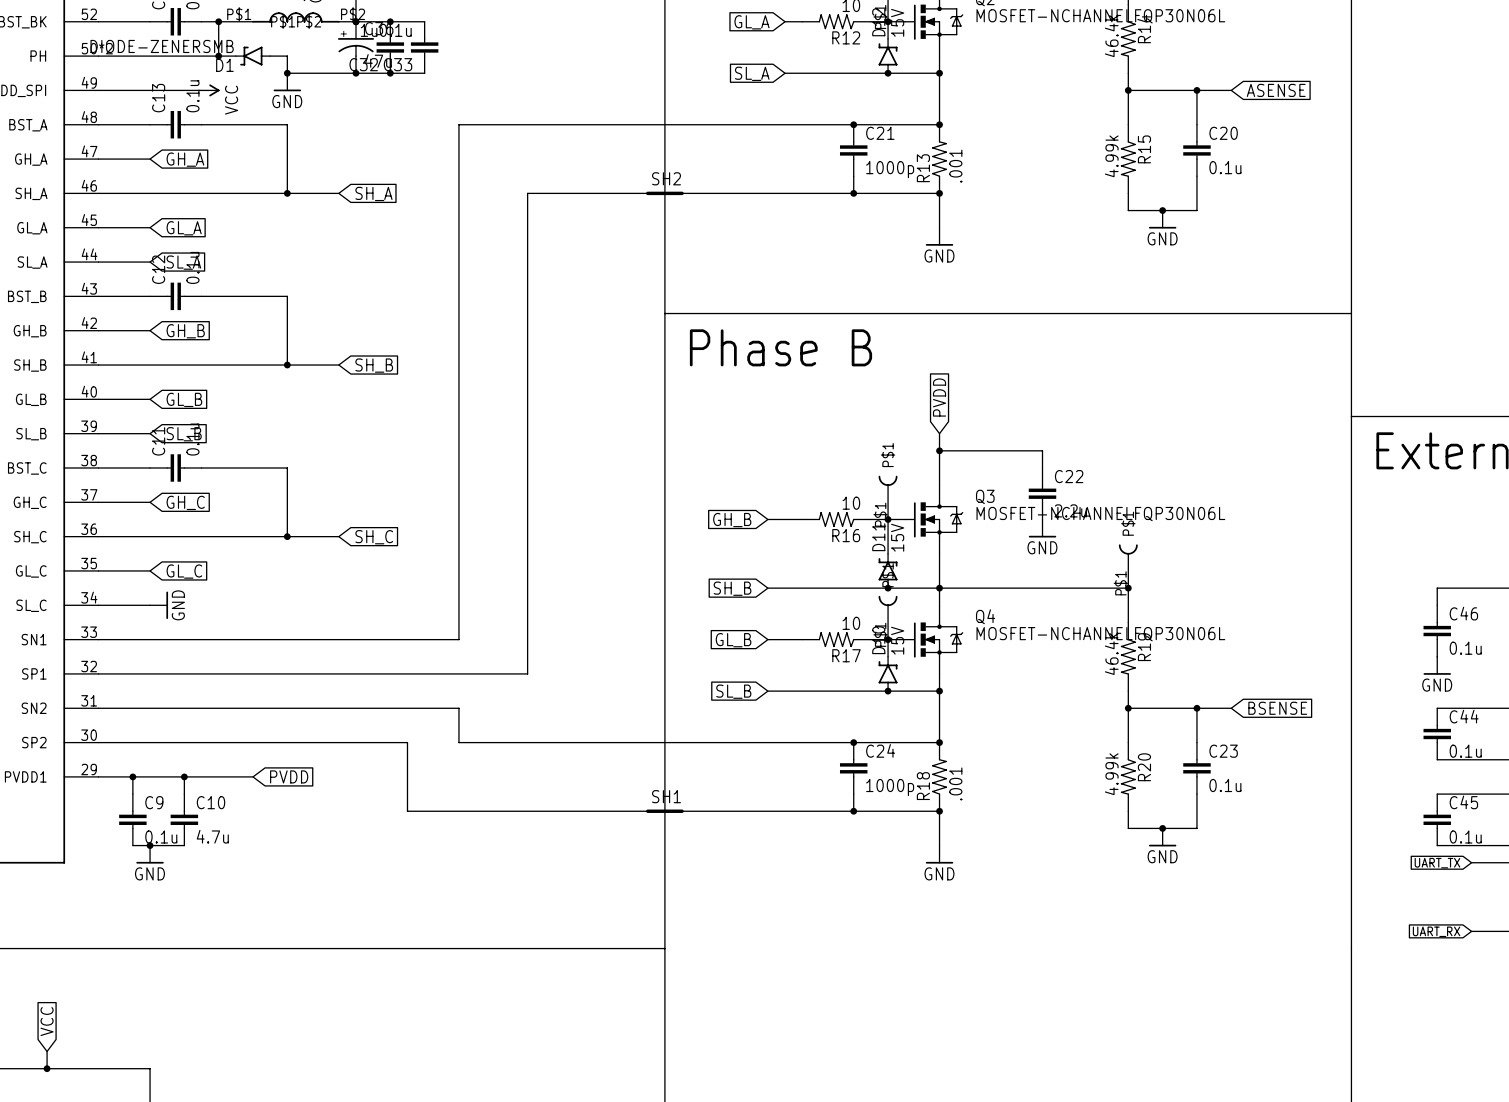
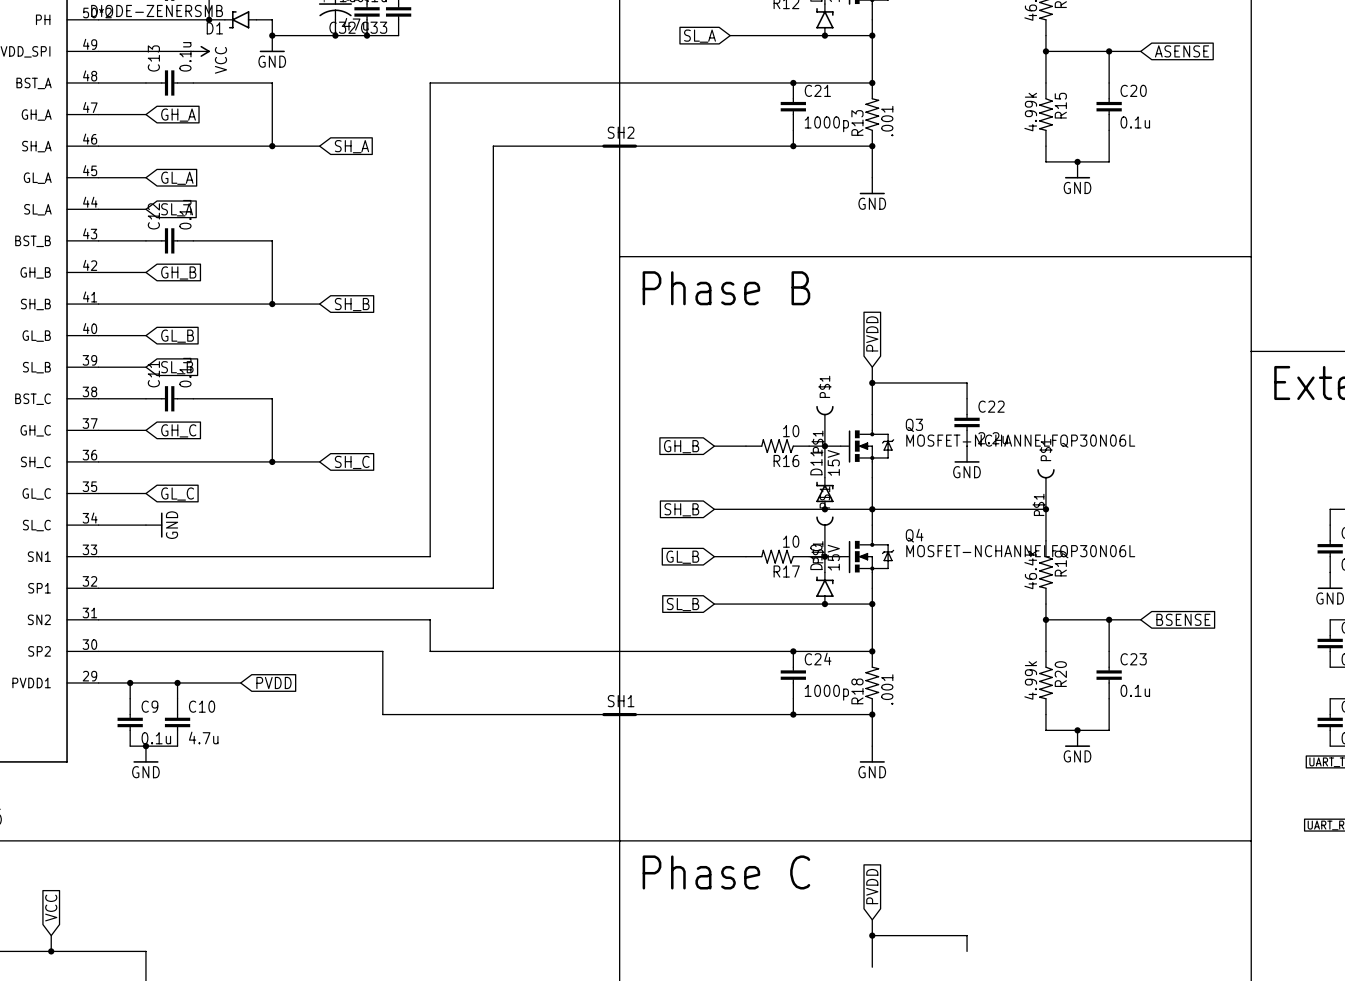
line: none -> (619, 840) (1251, 840)
text: none -> Phase C (726, 872)
global label: none -> PVDD (872, 886)
wire: none -> (872, 919) (872, 967)
wire: none -> (872, 935) (967, 935) (967, 951)
junction: none -> (872, 935)

